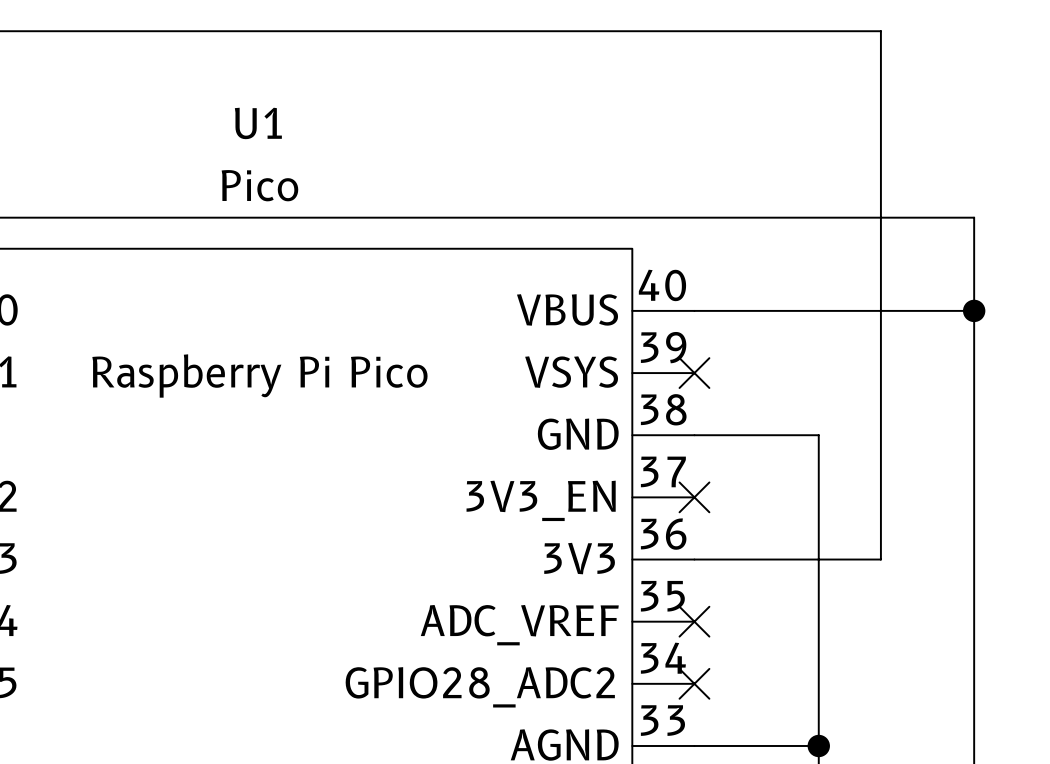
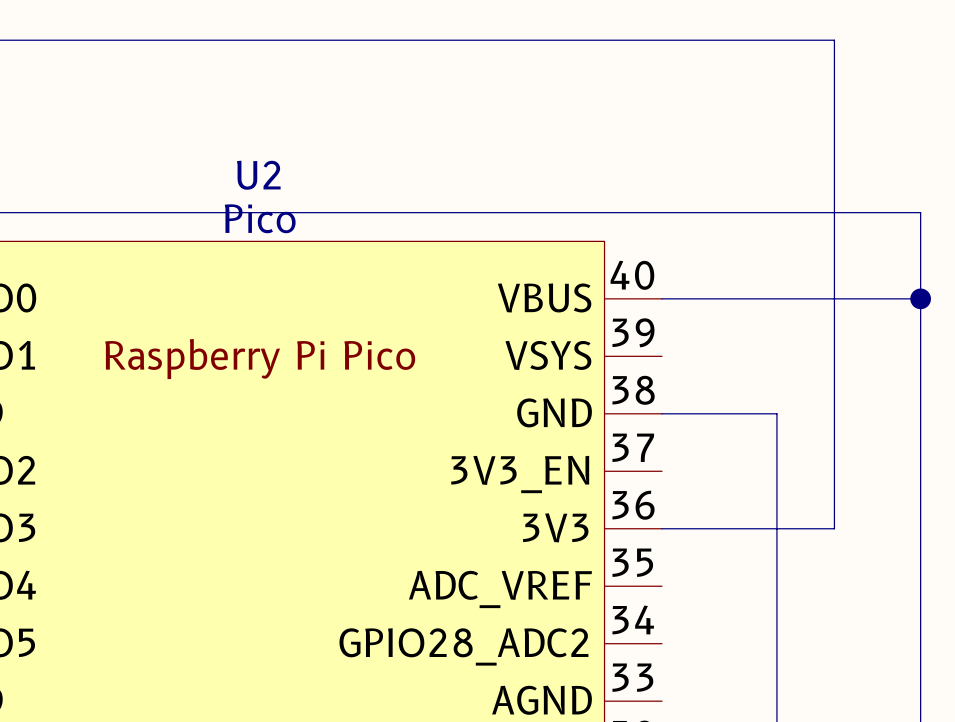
U1 name: U1 (258, 123) -> U2 (258, 175)
U1 value position: Pico (259, 185) -> Pico (260, 218)
no-connect mark: (694, 373) -> none
no-connect mark: (694, 497) -> none
no-connect mark: (694, 621) -> none
no-connect mark: (694, 683) -> none
wire: (694, 745) (818, 745) -> none
junction: (818, 745) -> none

